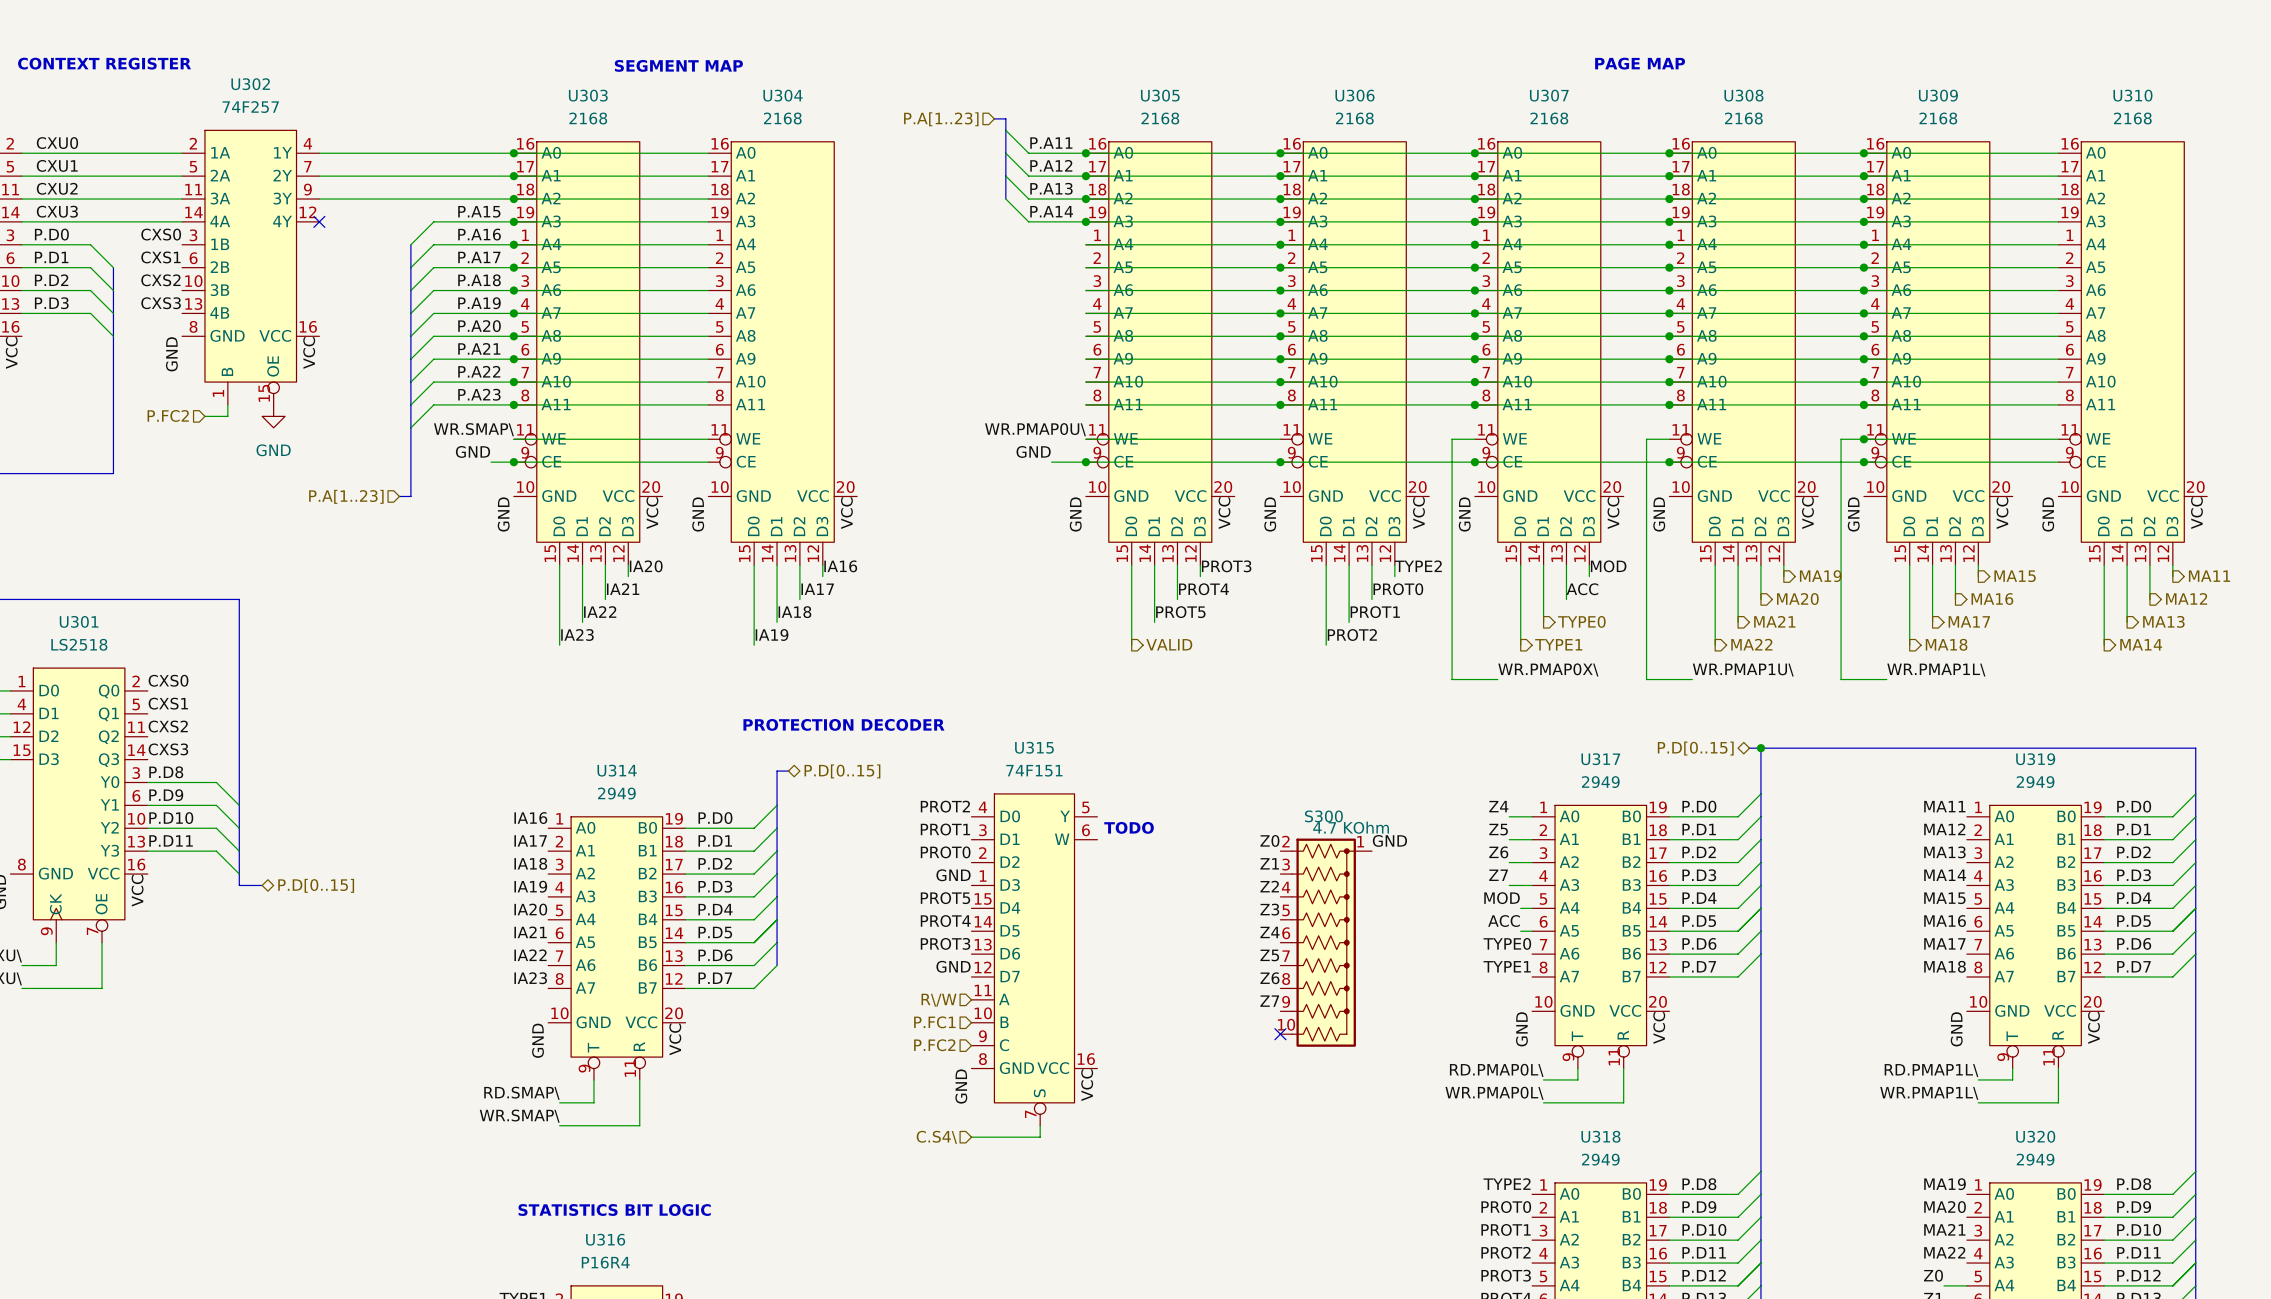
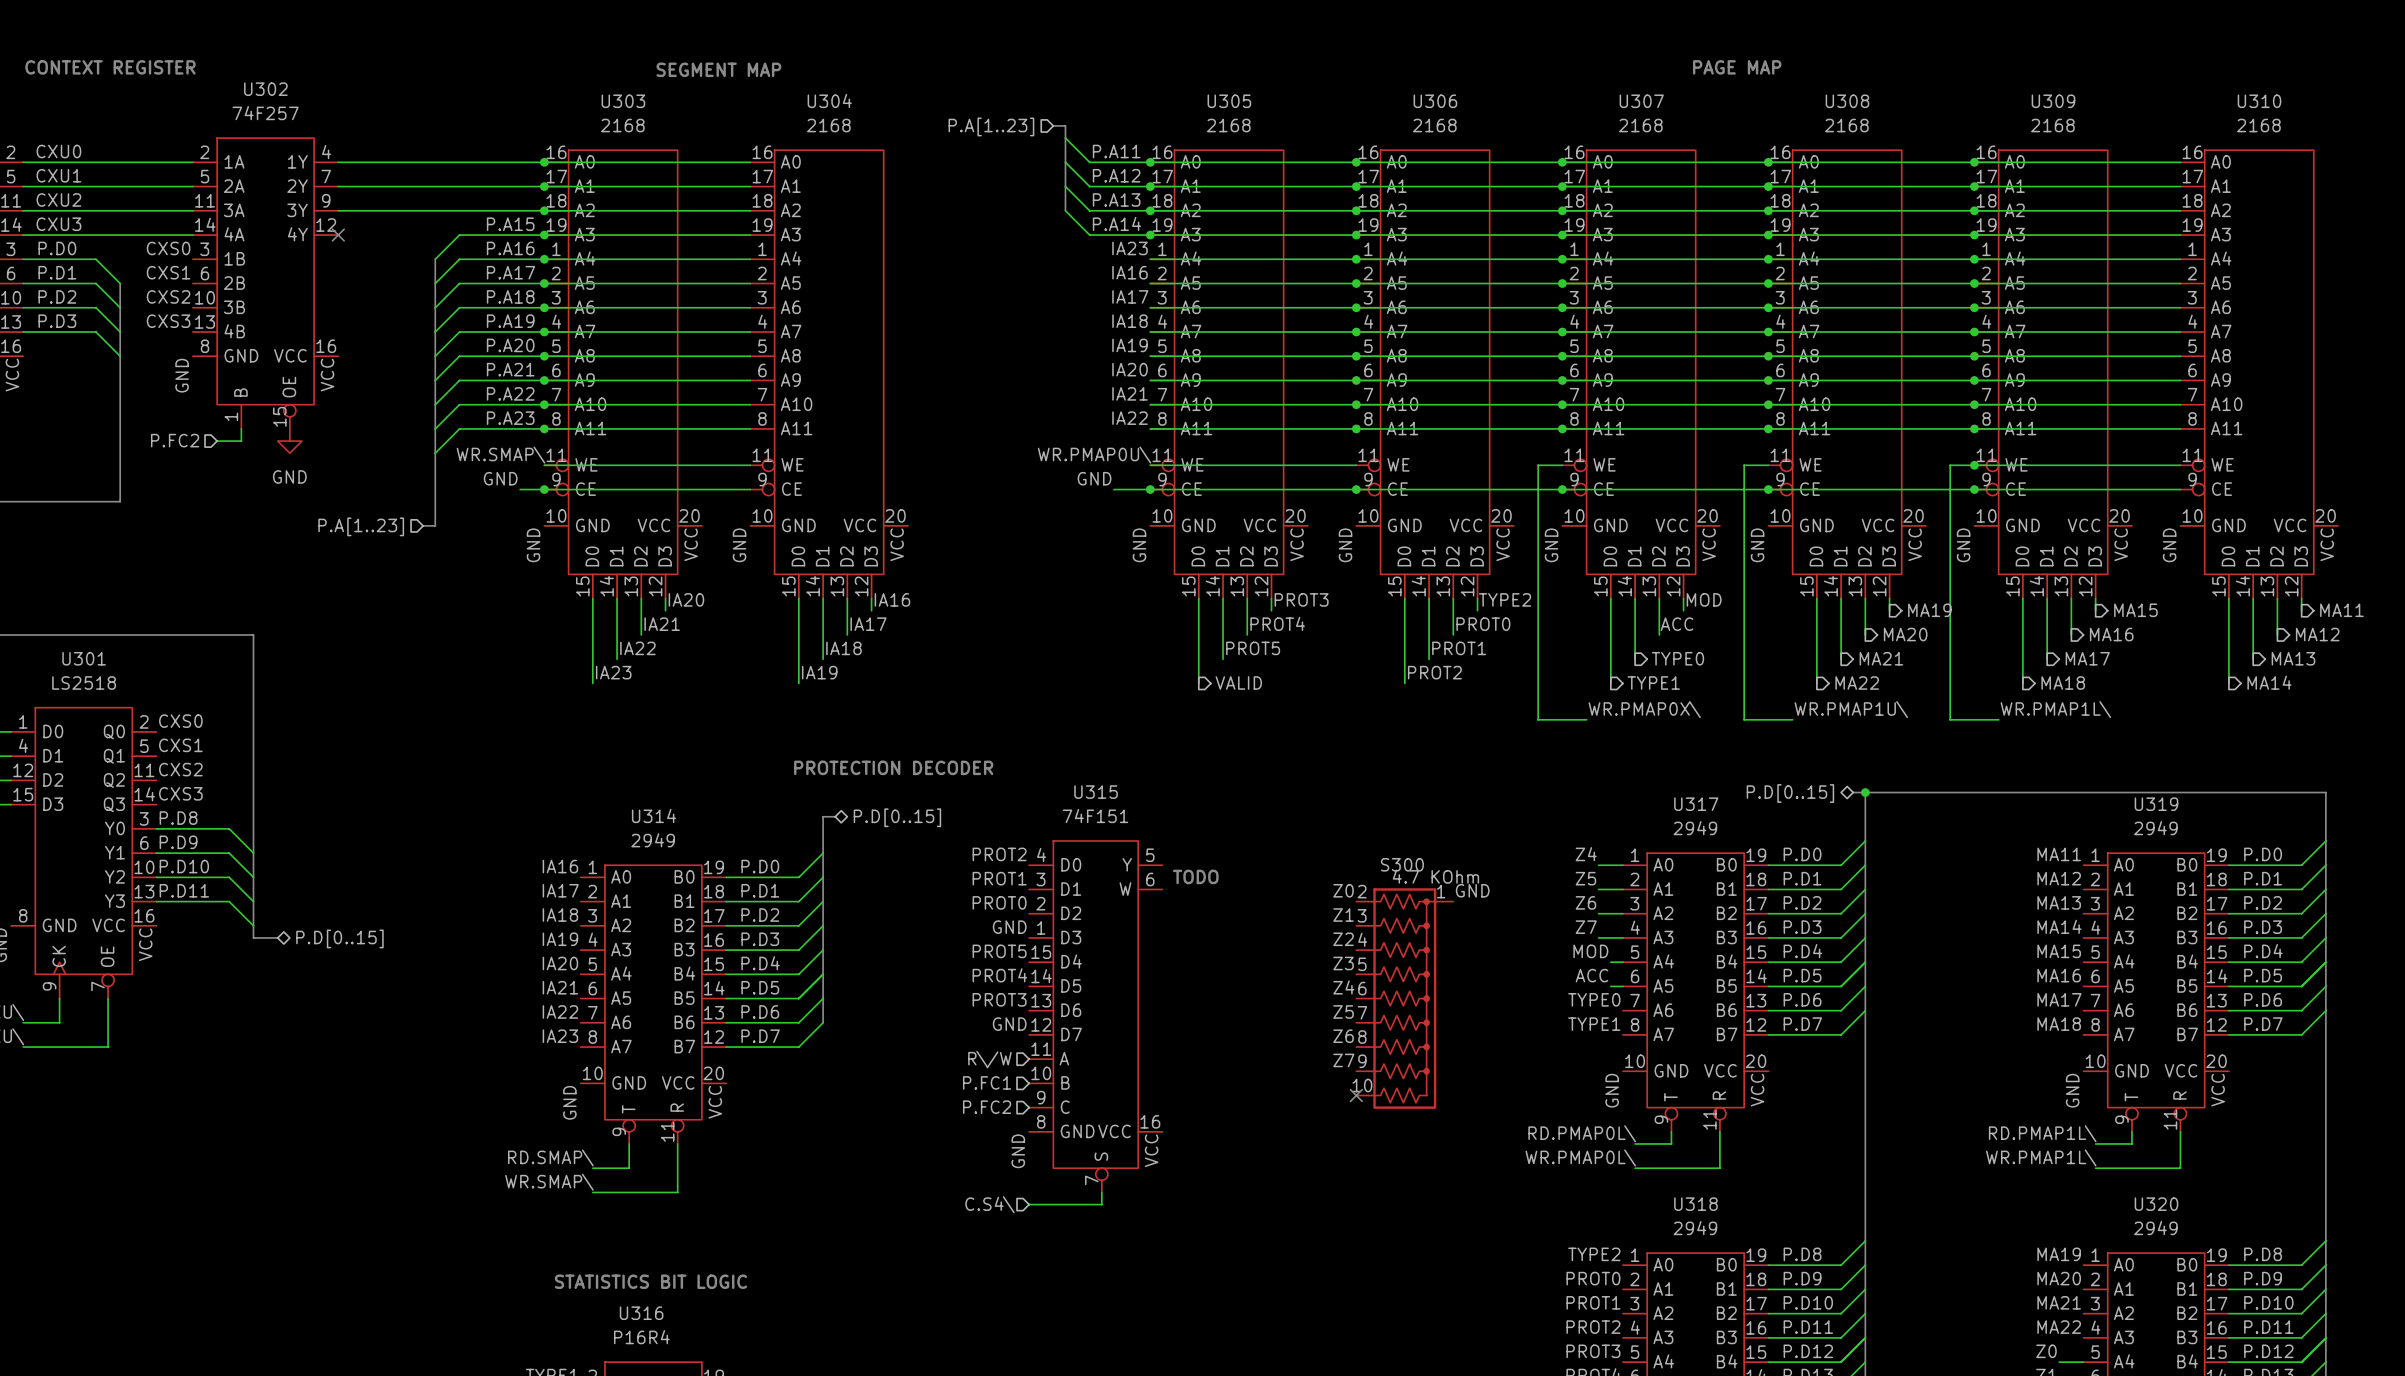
label: none -> IA23 (1130, 248)
label: none -> IA16 (1130, 272)
label: none -> IA17 (1130, 296)
label: none -> IA18 (1130, 321)
label: none -> IA19 (1130, 345)
label: none -> IA20 (1130, 369)
label: none -> IA21 (1130, 393)
label: none -> IA22 (1130, 418)

